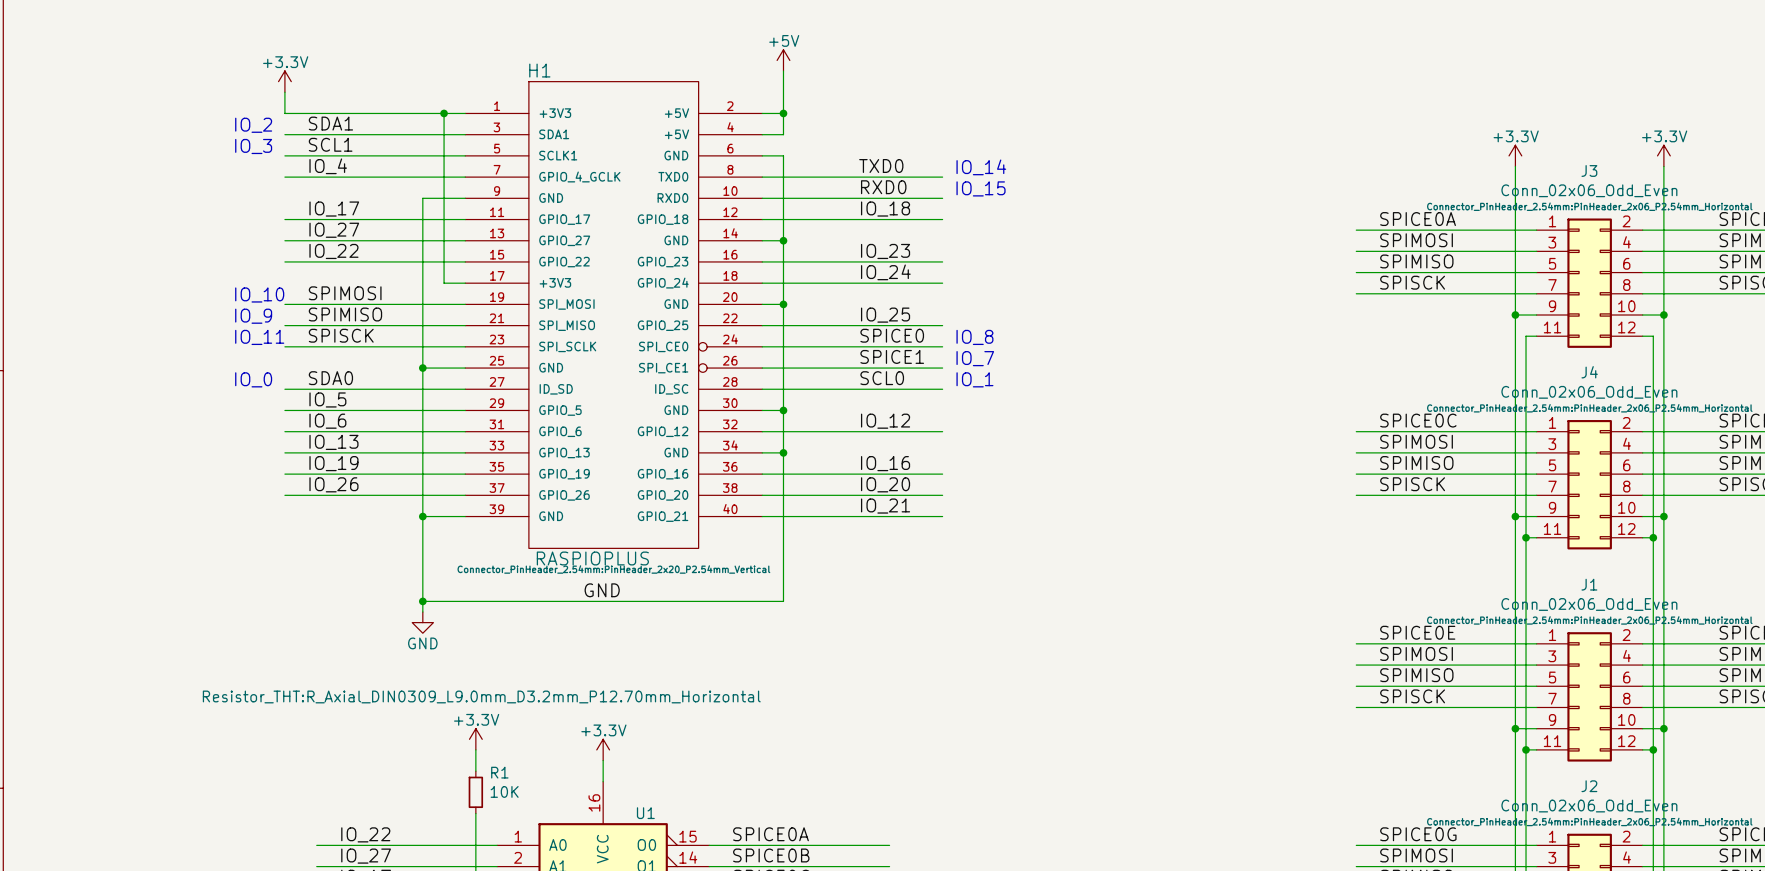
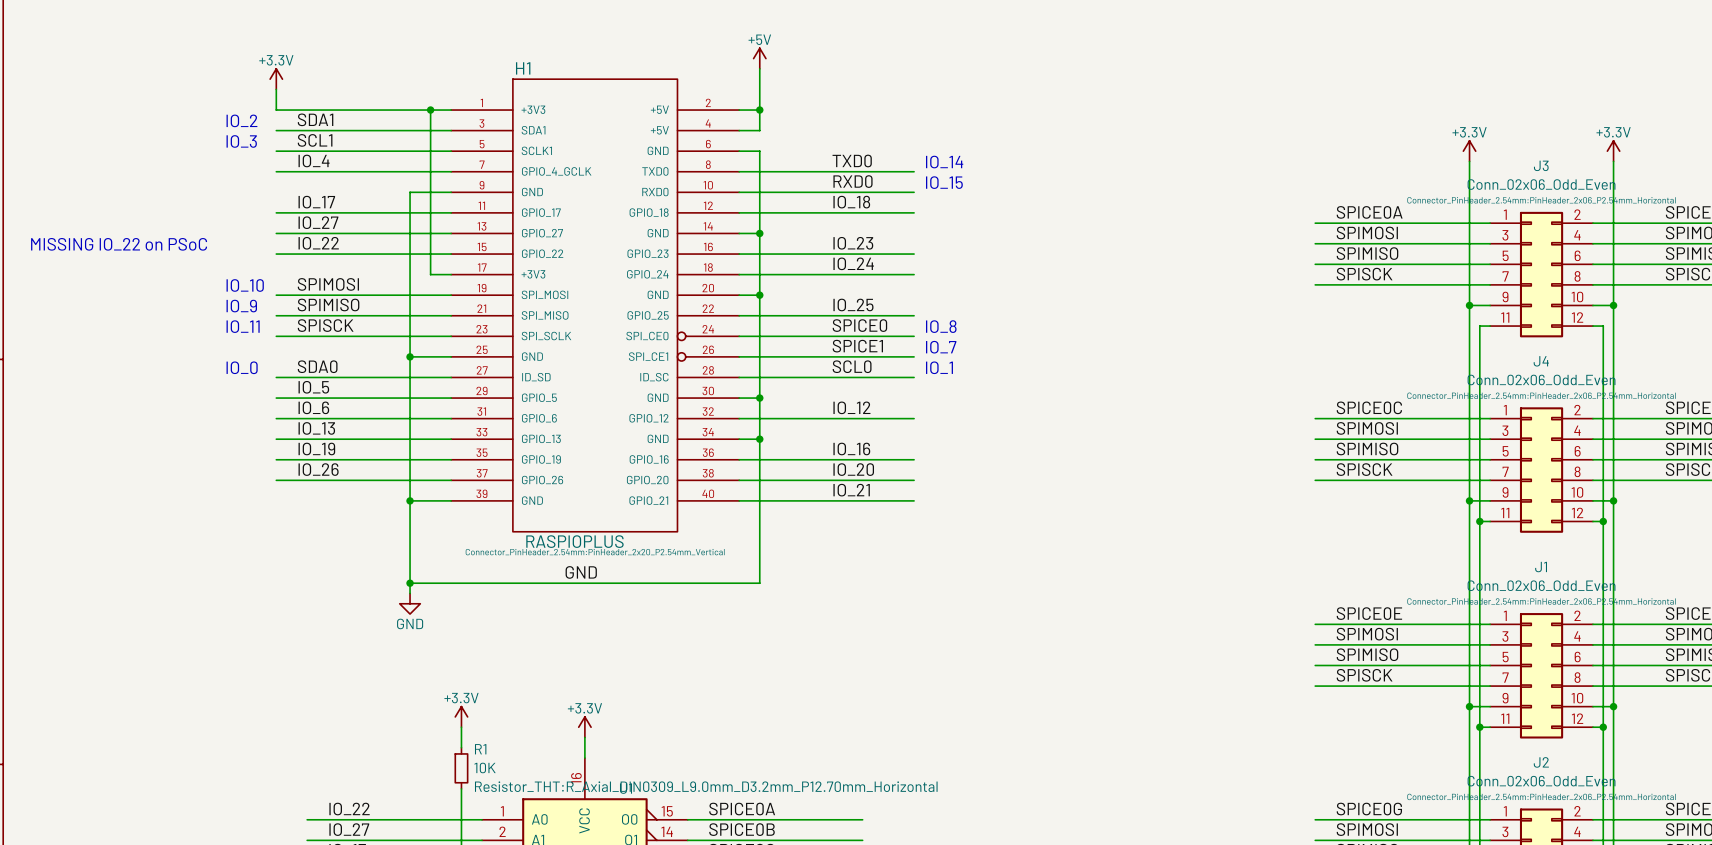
text: none -> MISSING IO_22 on PSoC (119, 244)
R1 text position: Resistor_THT:R_Axial_DIN0309_L9.0mm_D3.2mm_P12.70mm_Horizontal (481, 696) -> Resistor_THT:R_Axial_DIN0309_L9.0mm_D3.2mm_P12.70mm_Horizontal (706, 786)

